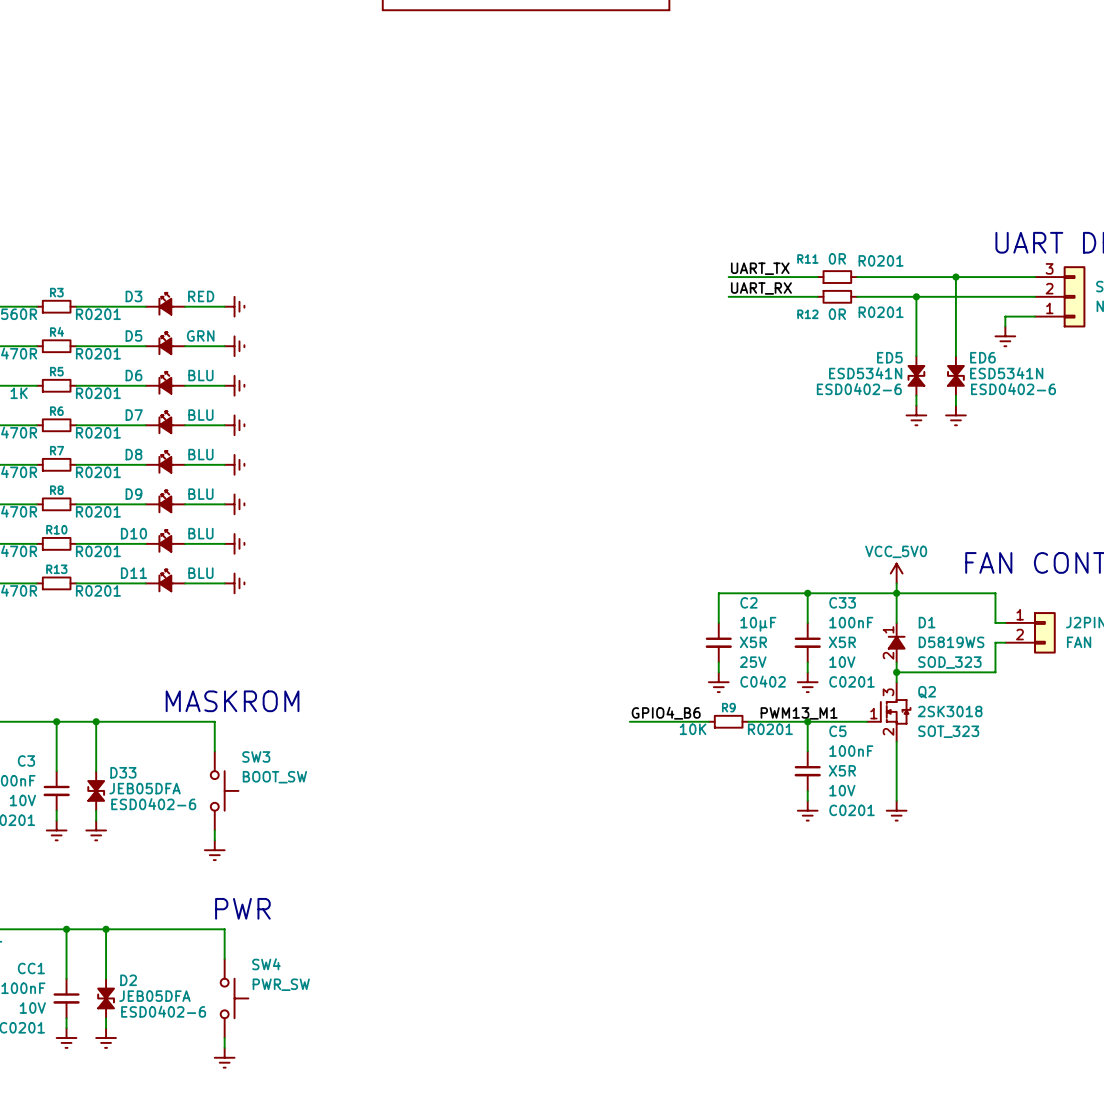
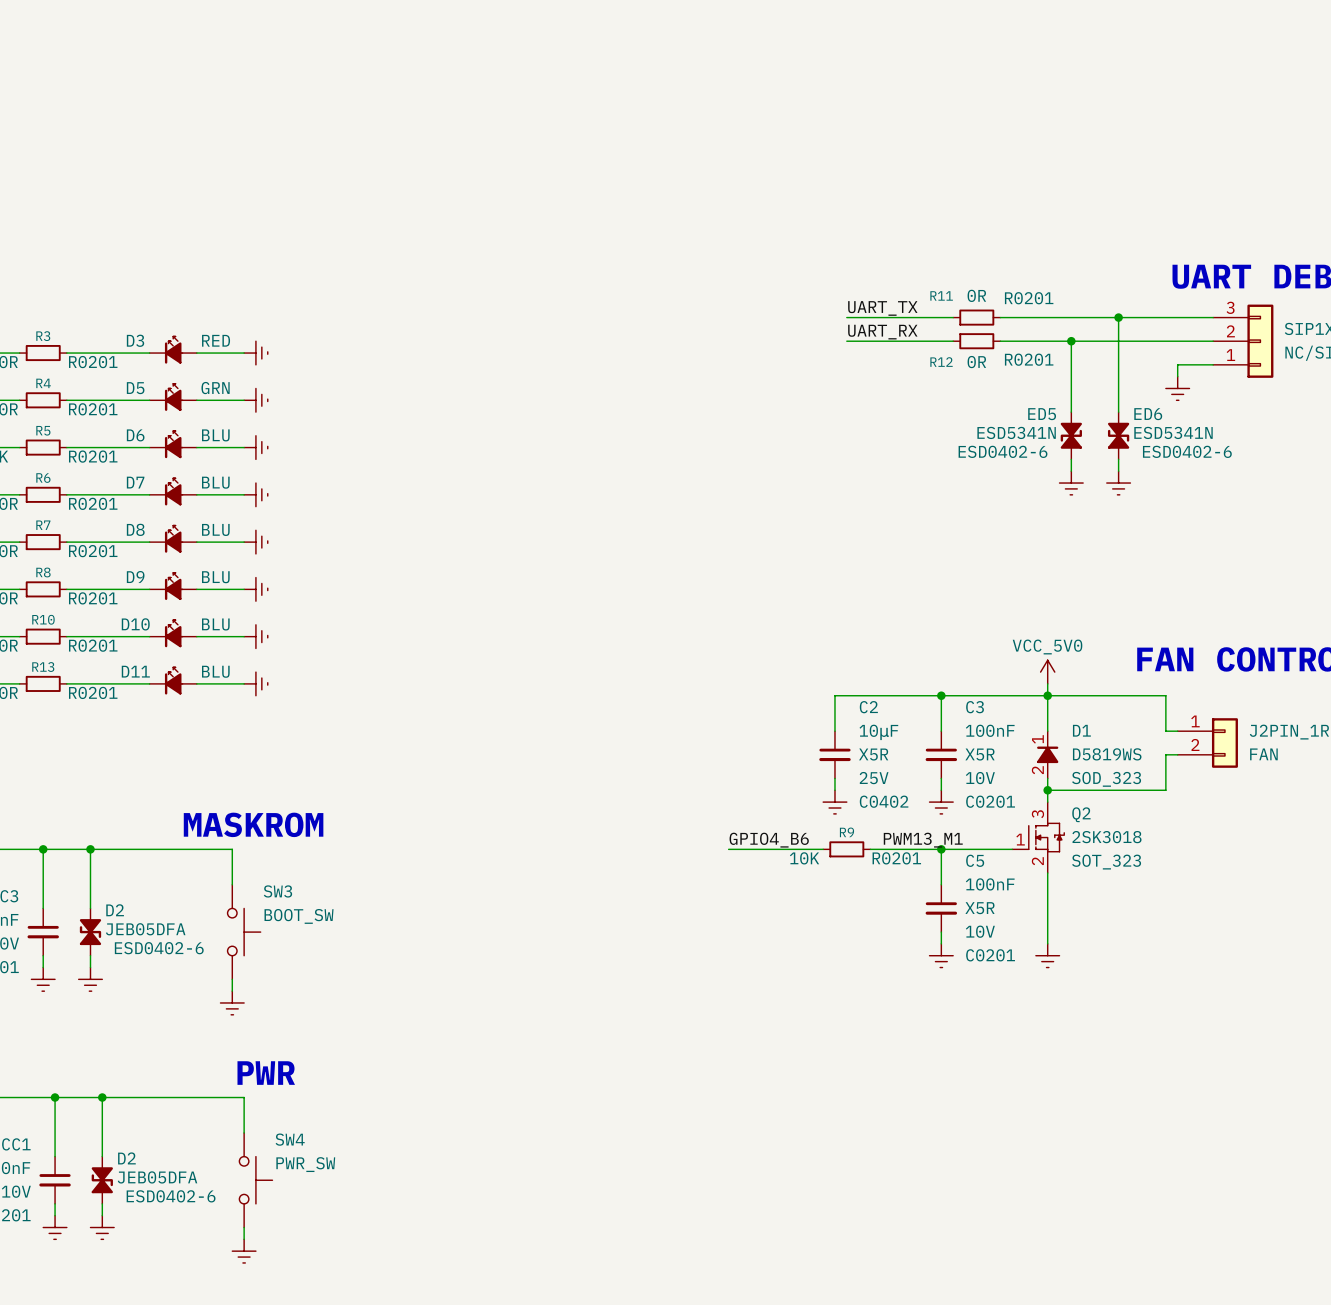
C33 name: C33 (842, 602) -> C3 (975, 707)
D33 name: D33 (123, 772) -> D2 (115, 910)

